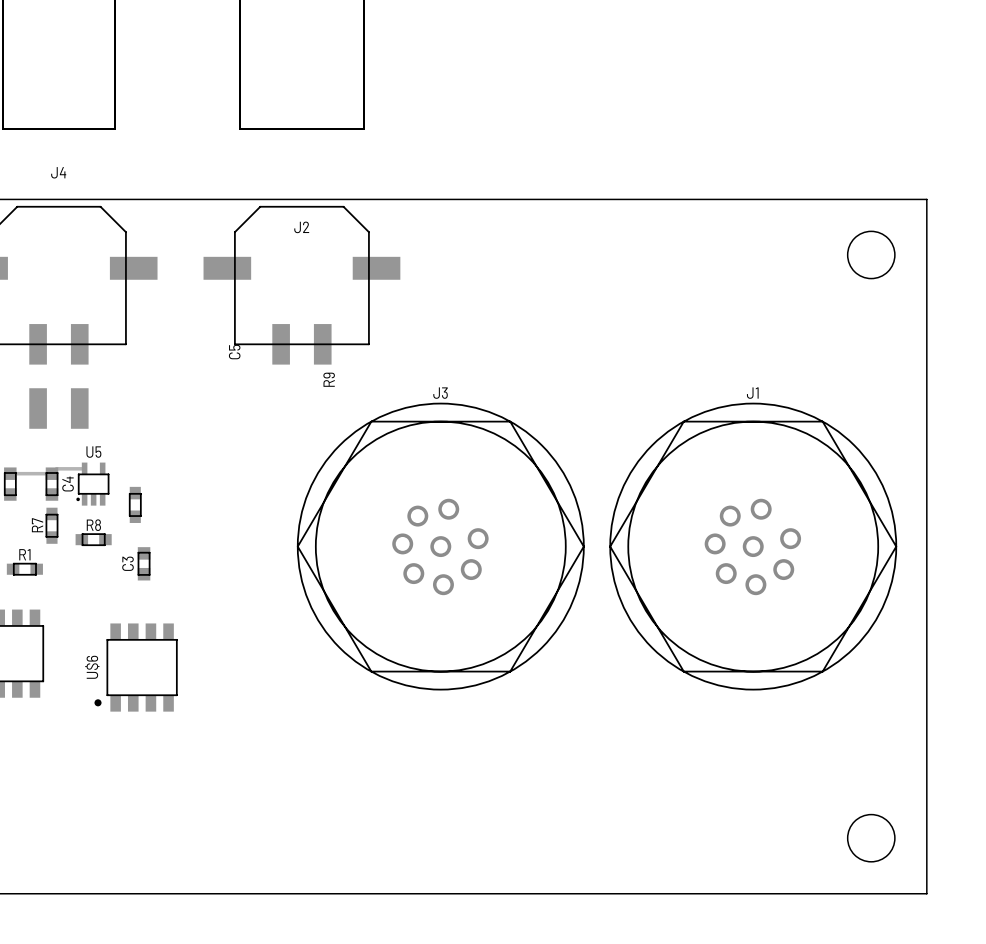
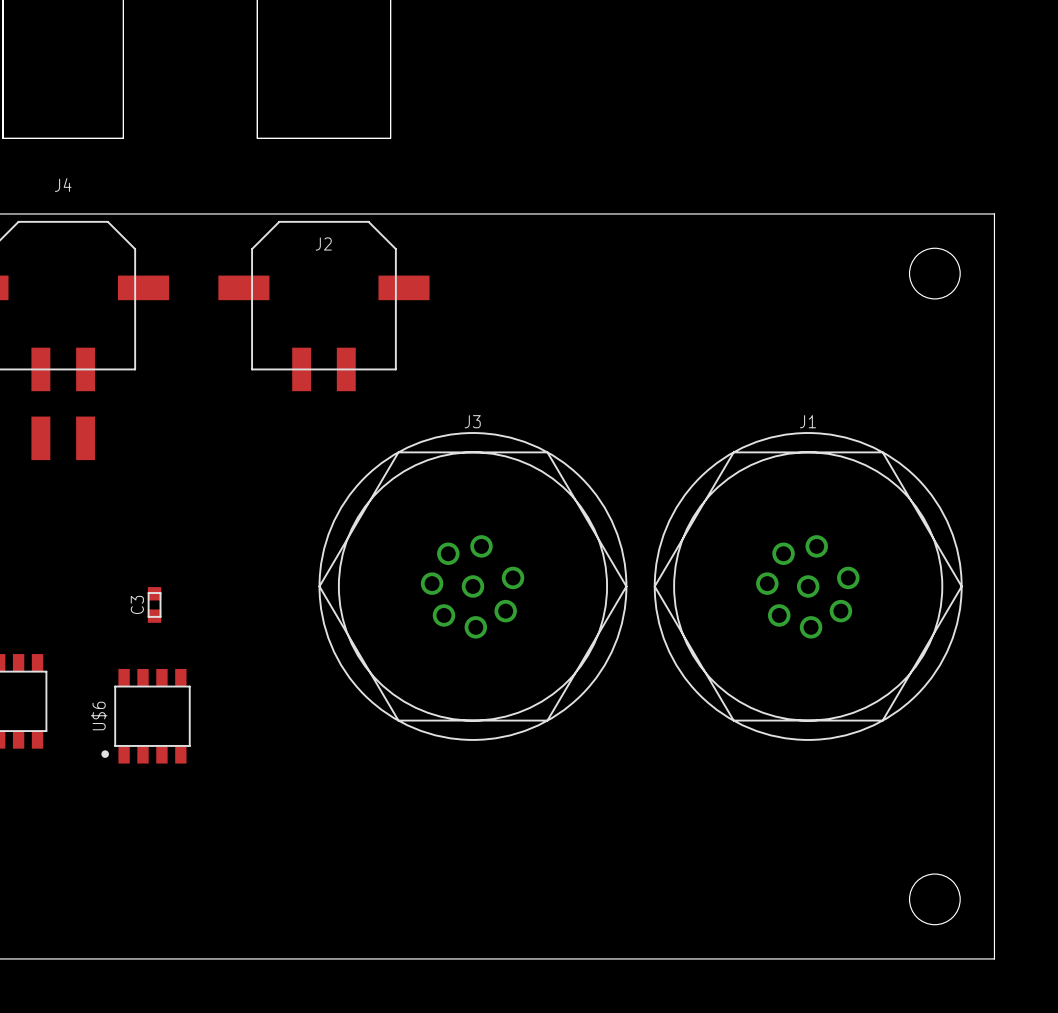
track: (84, 468) (56, 468) (51, 473) (10, 473) -> none
C5: (10, 484) -> none
C4: (51, 484) -> none
U5: (92, 484) -> none
R9: (135, 504) -> none
R7: (51, 525) -> none
R8: (93, 539) -> none
R1: (24, 569) -> none

